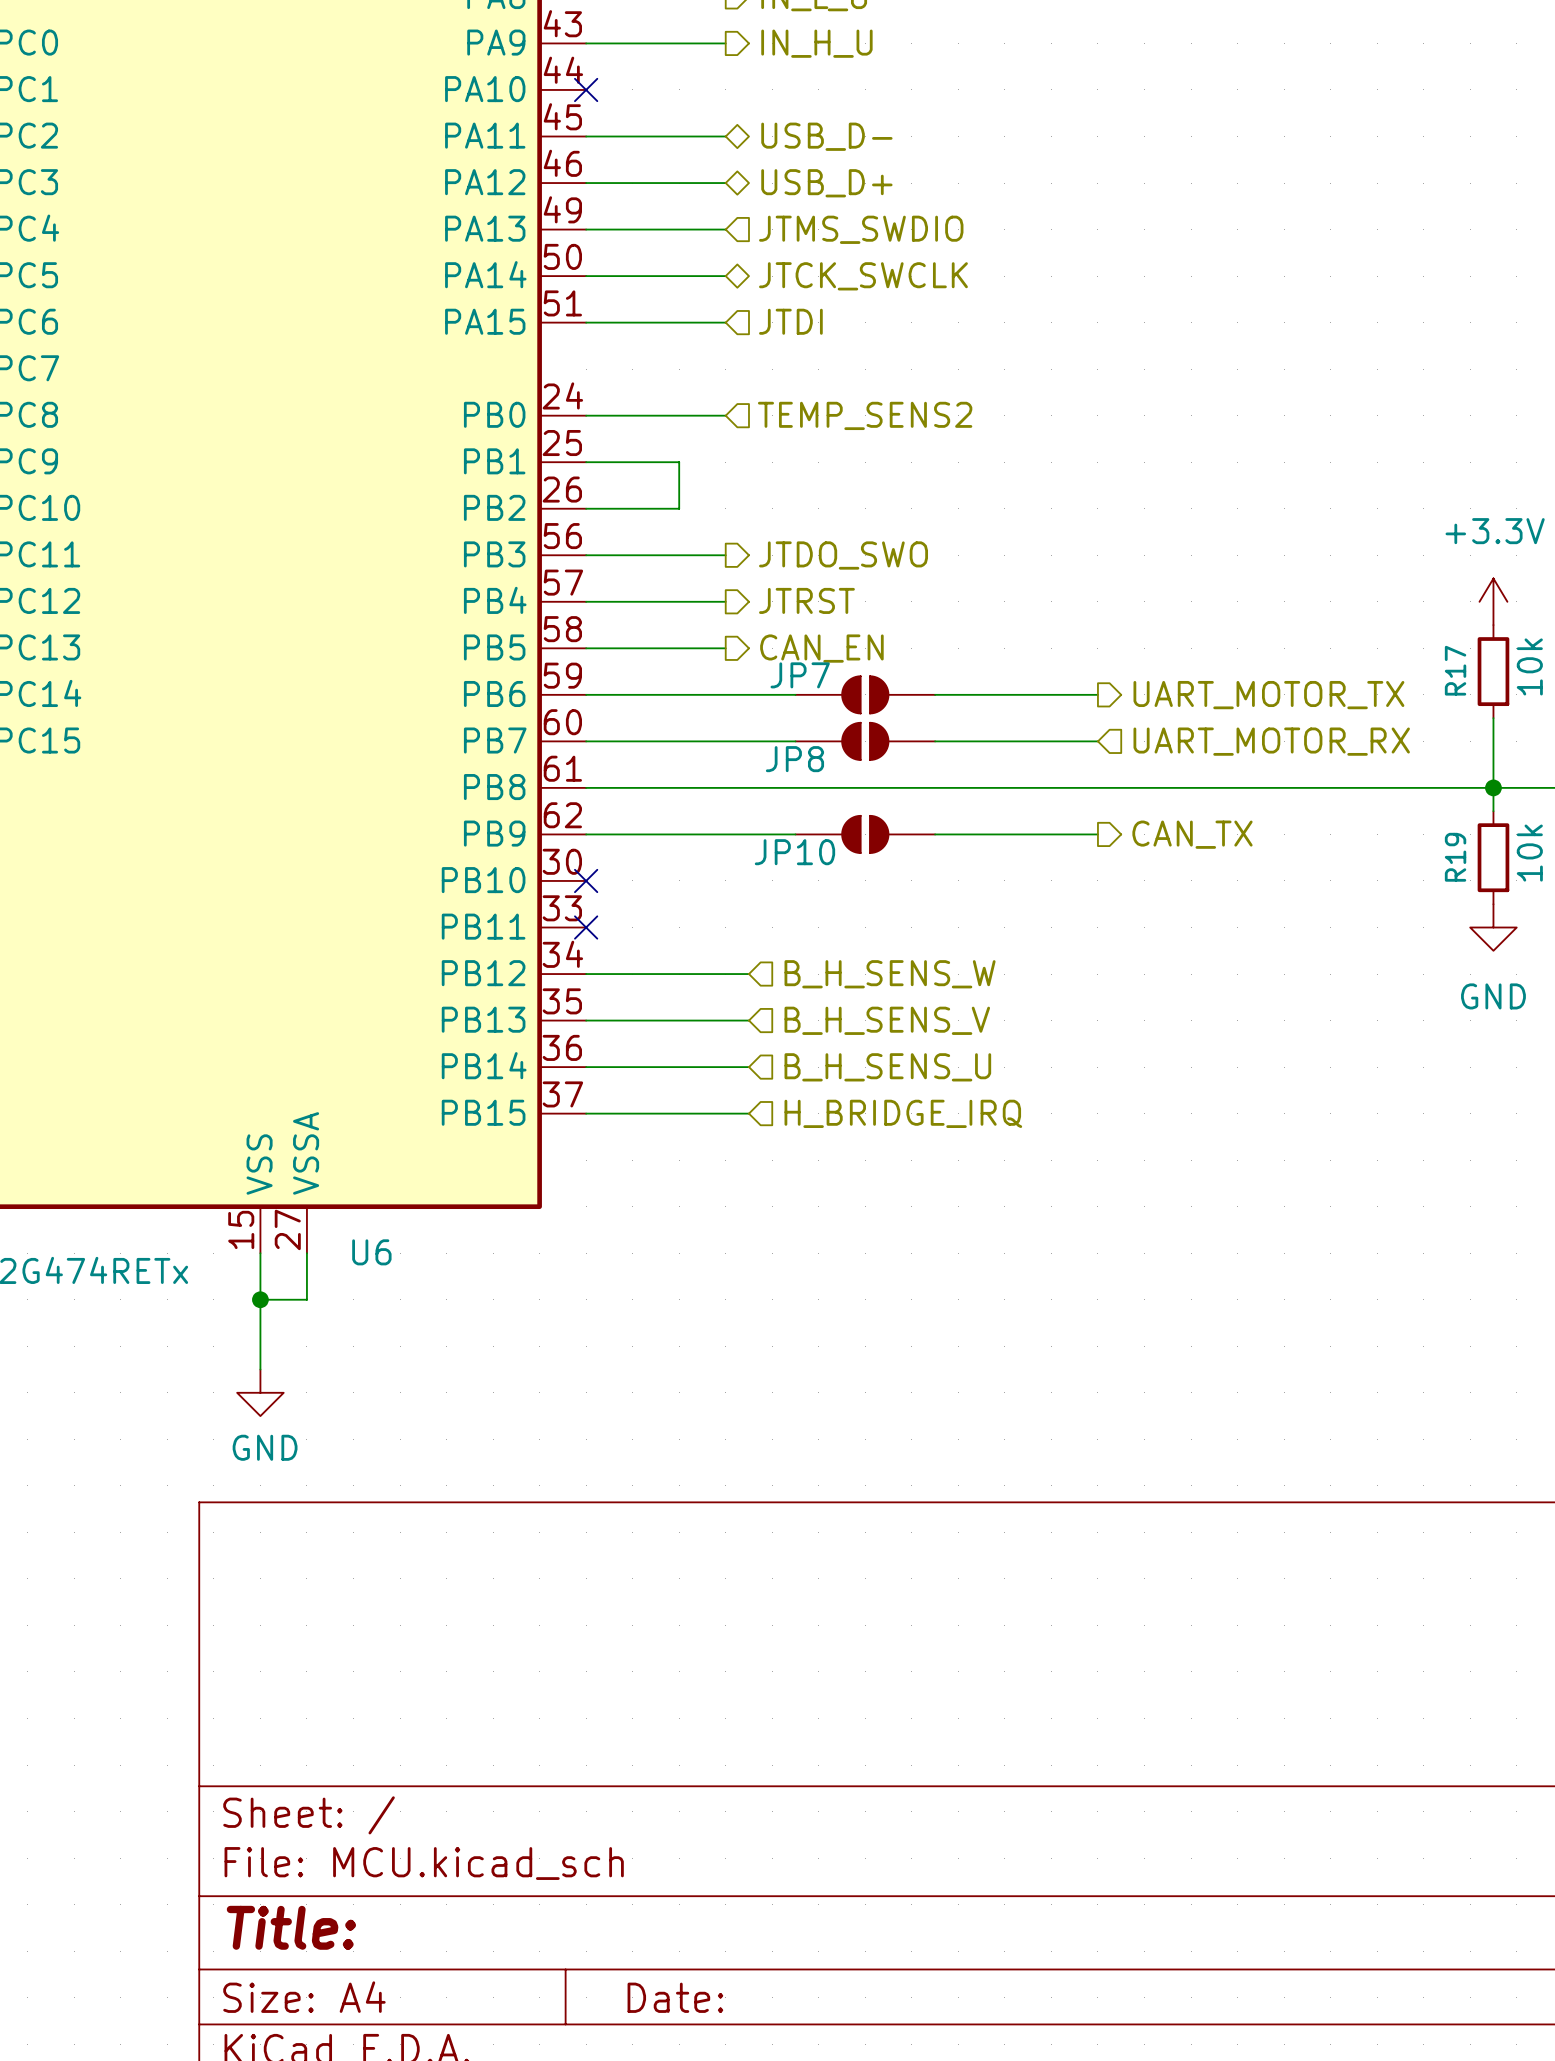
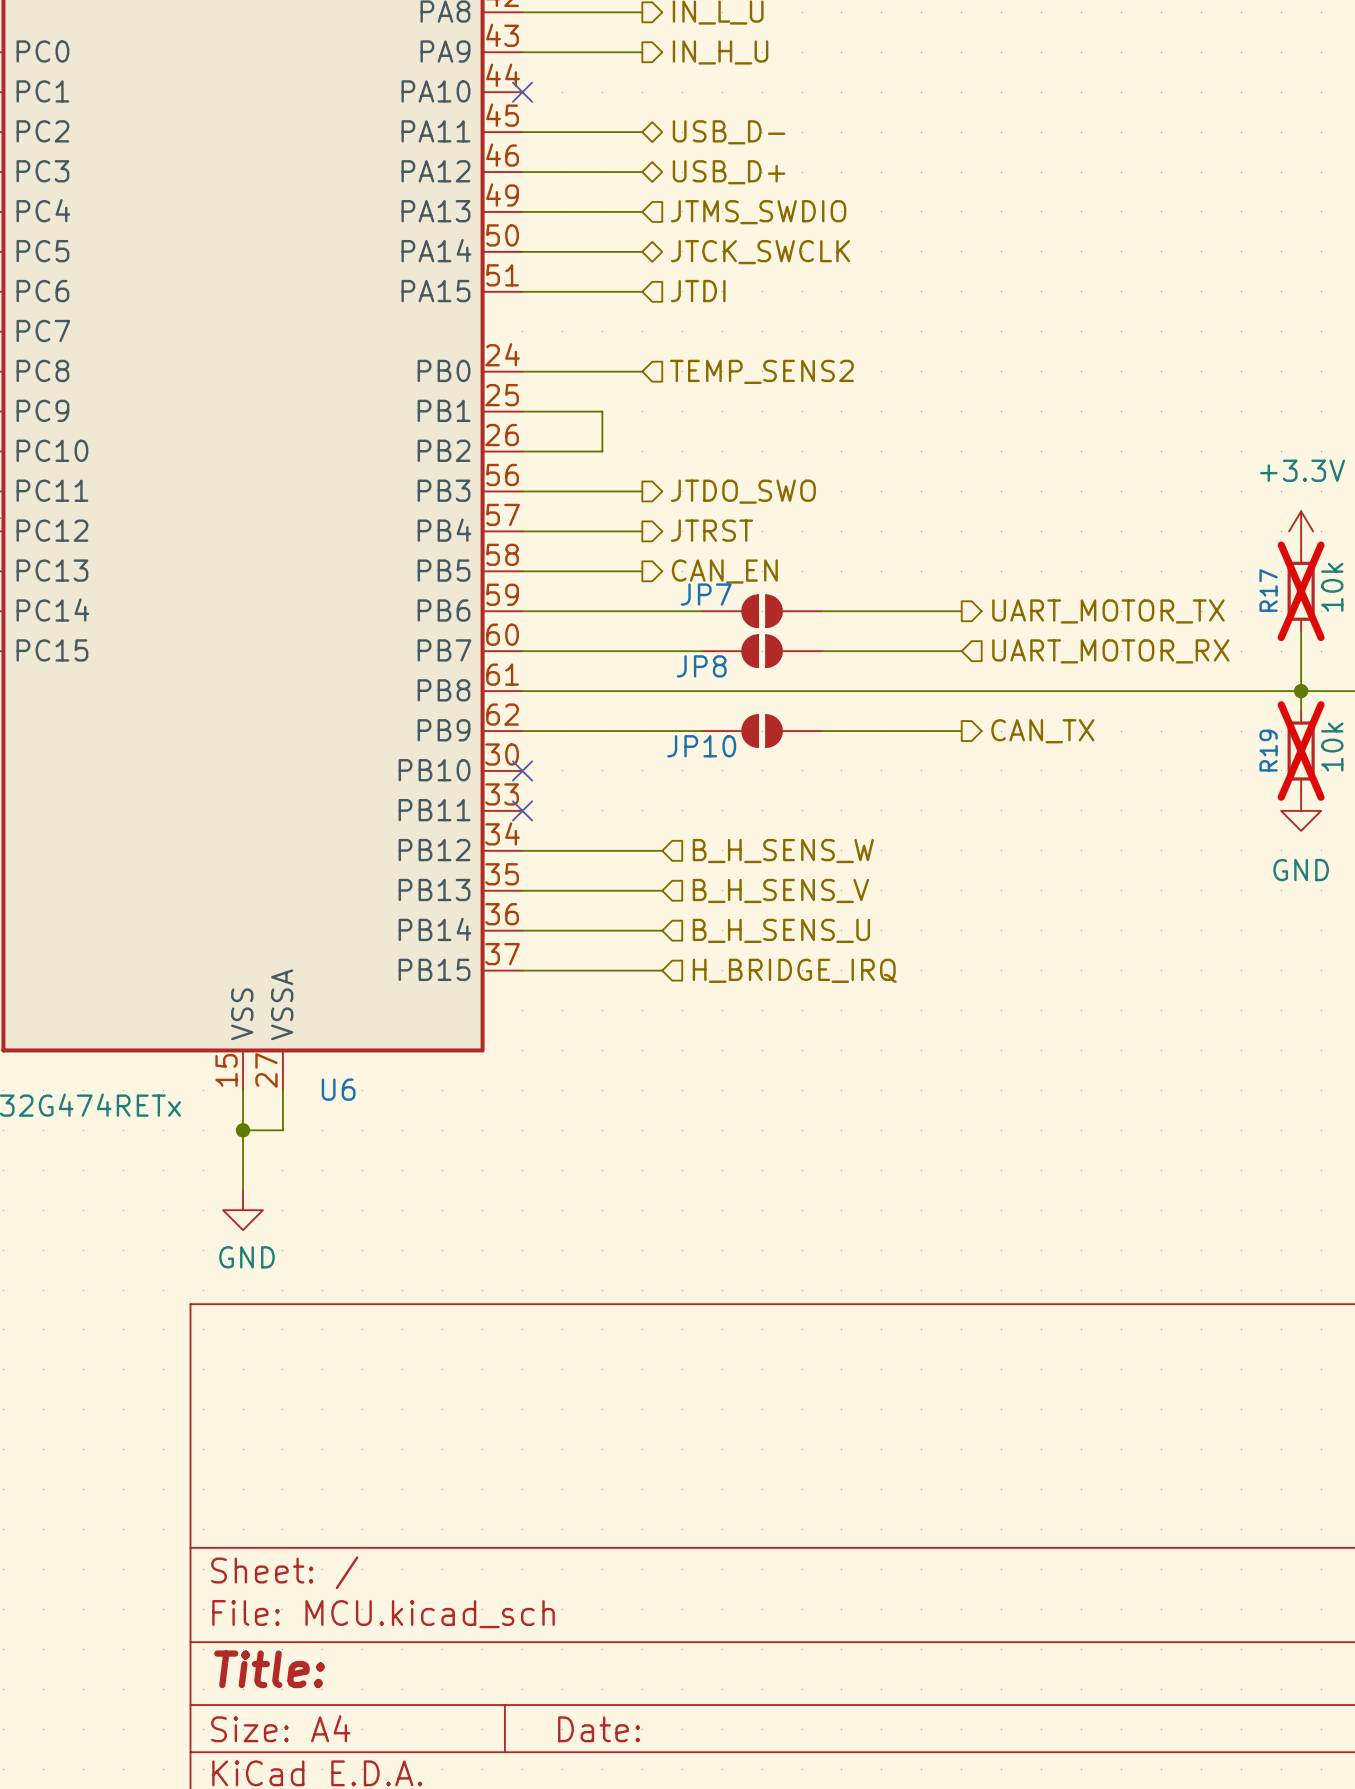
R17 do-not-place cross: none -> (1301, 591)
R19 do-not-place cross: none -> (1301, 751)

